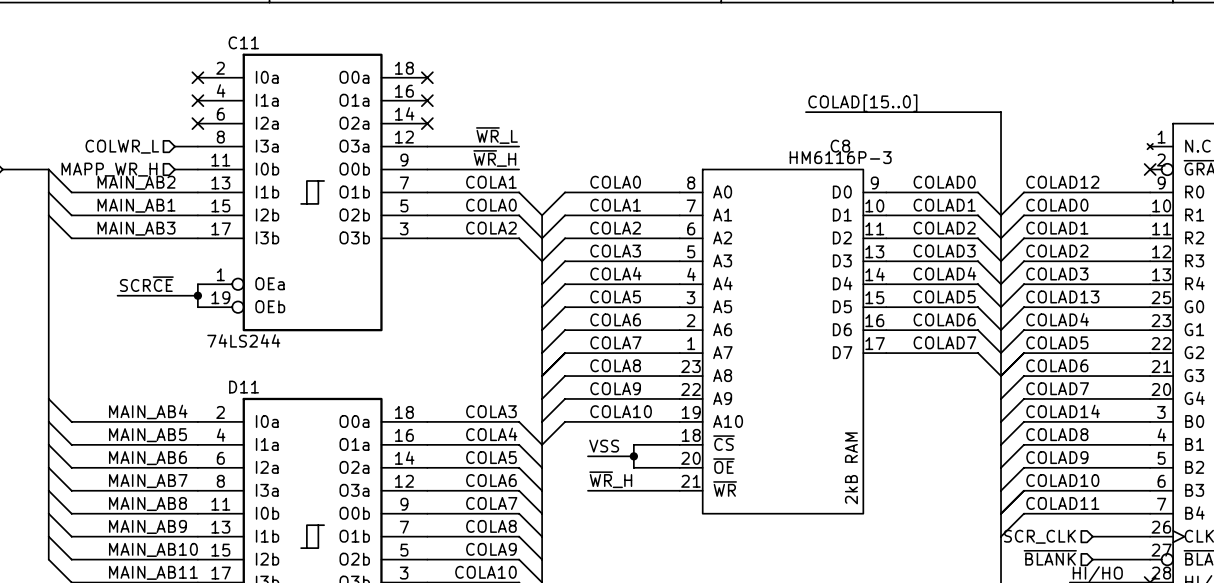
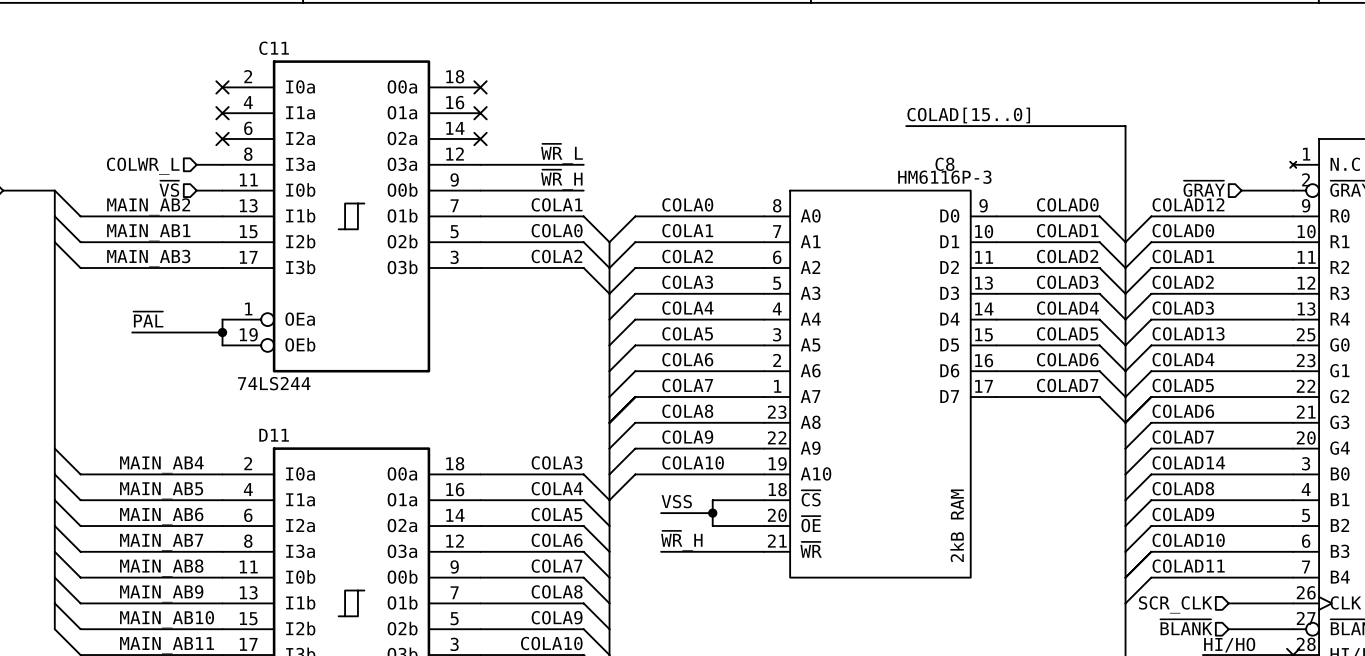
hierarchical label: none -> ~{GRAY} (1204, 188)
hierarchical label: MAPP_WR_H (109, 169) -> ~{VS} (169, 188)
wire: none -> (1241, 190) (1293, 190)
no-connect mark: (1150, 169) -> none
label: SCR~{CE} (146, 284) -> ~{PAL} (148, 319)

